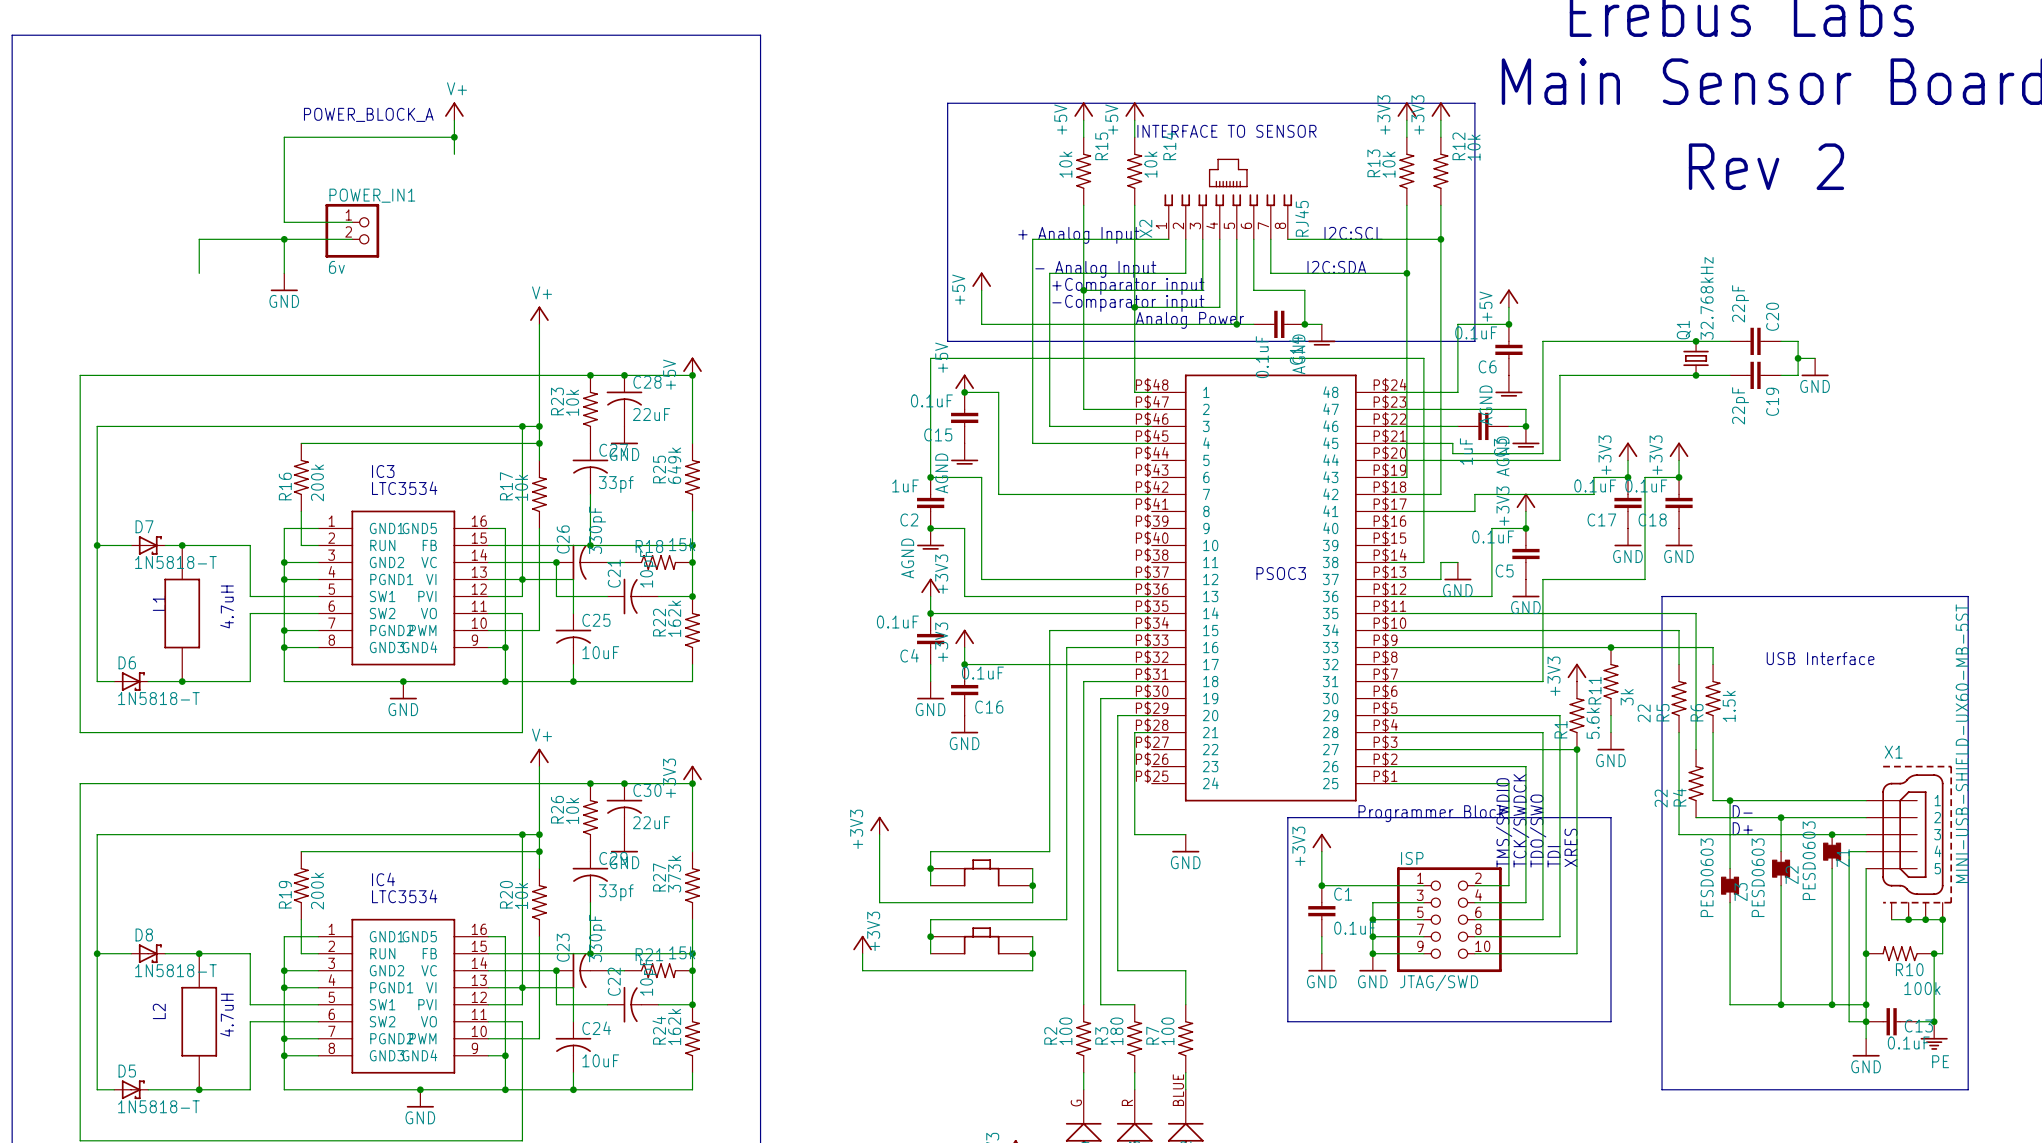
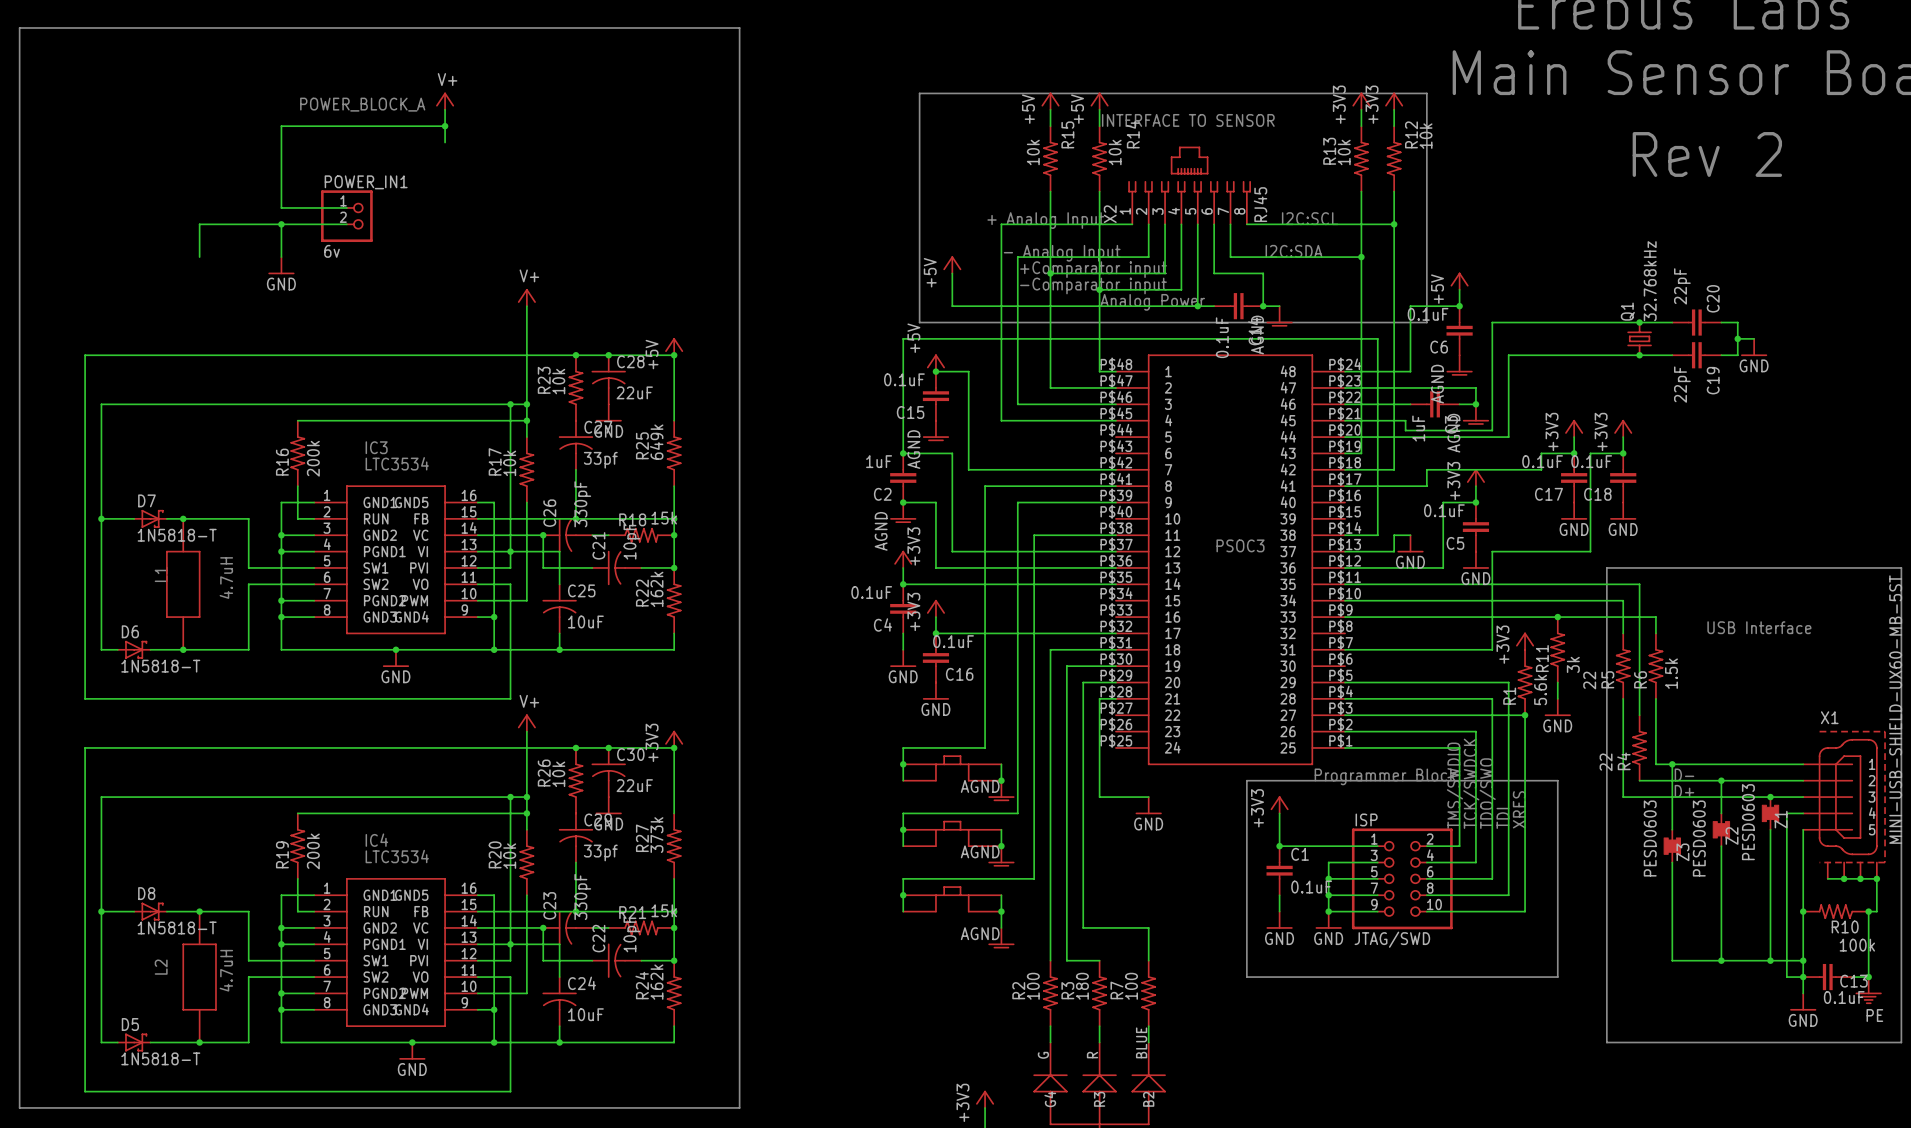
wire: none -> (1115, 486) (985, 486) (985, 747) (903, 747) (903, 780)
wire: (1049, 630) (1151, 630) -> (1017, 600) (1017, 502) (1115, 502)
wire: (1066, 647) (1151, 647) -> (1034, 617) (1034, 535) (1115, 535)
junction: none -> (903, 764)
wire: none -> (1001, 764) (1001, 780)
part: none -> (952, 768)
junction: none -> (1001, 780)
power symbol: +3V3 (879, 825) -> none
power symbol: none -> AGND (1001, 790)
wire: (879, 834) (879, 902) (1032, 902) (1032, 885) -> none
power symbol: none -> AGND (1001, 856)
power symbol: +3V3 (862, 944) -> none
wire: (862, 953) (862, 970) (1032, 970) -> none
power symbol: none -> AGND (1001, 938)

